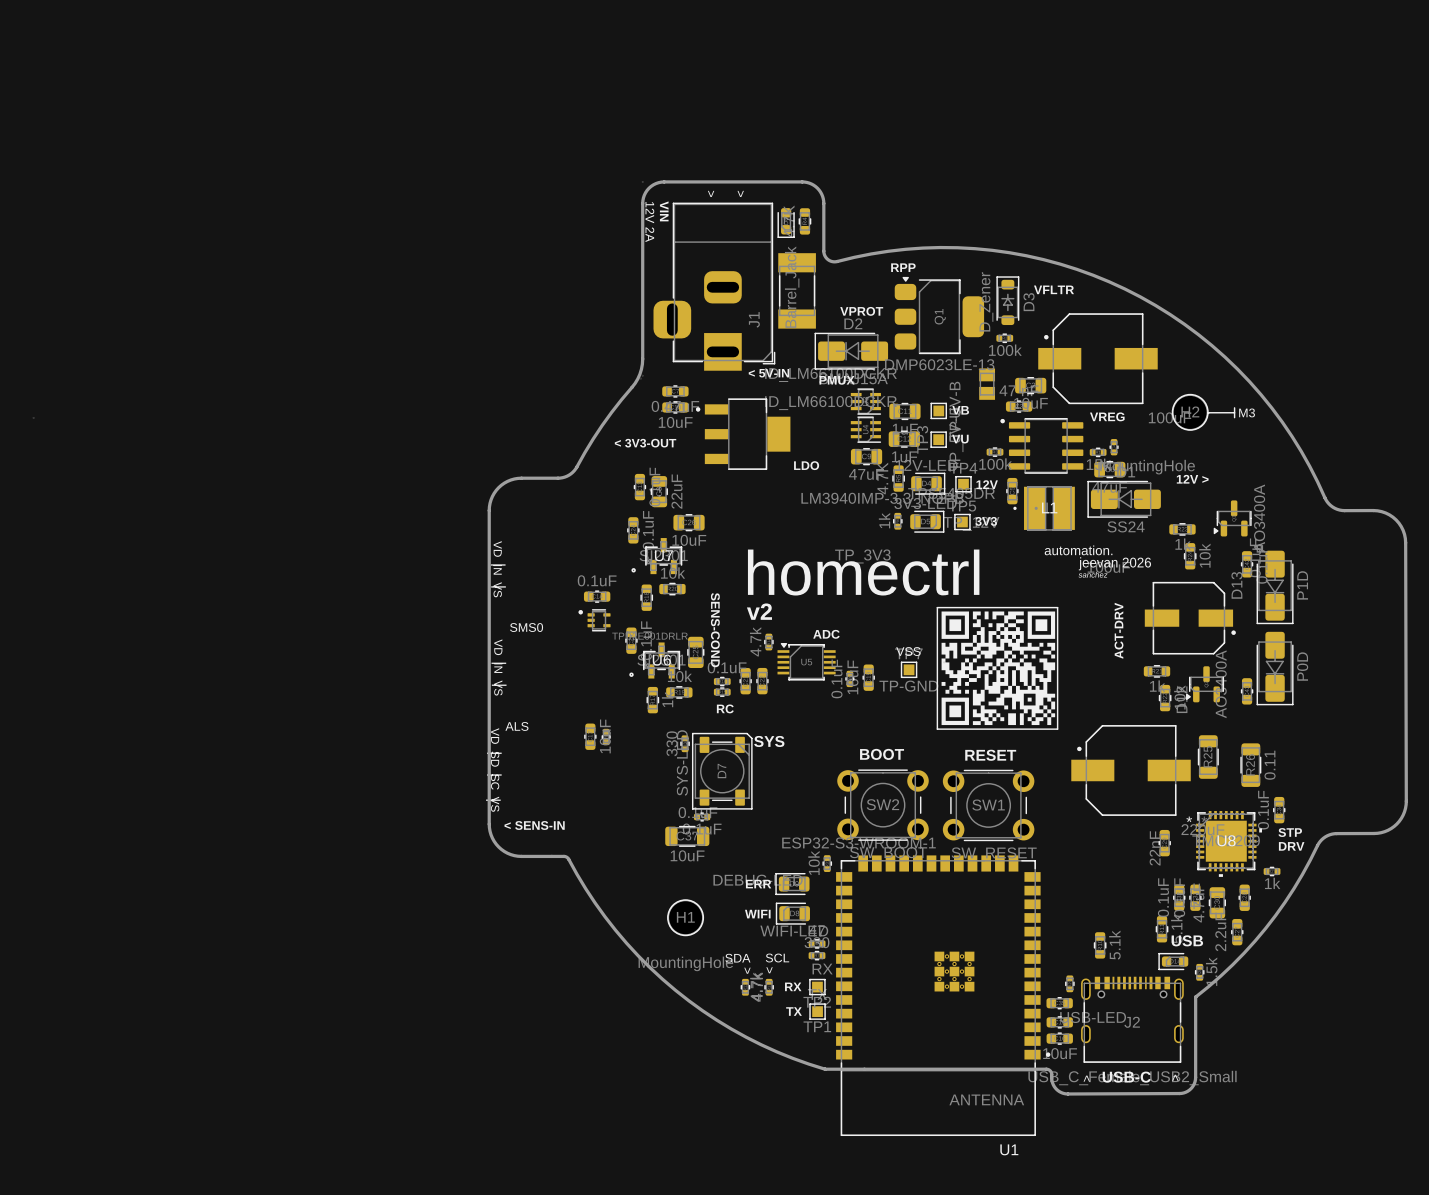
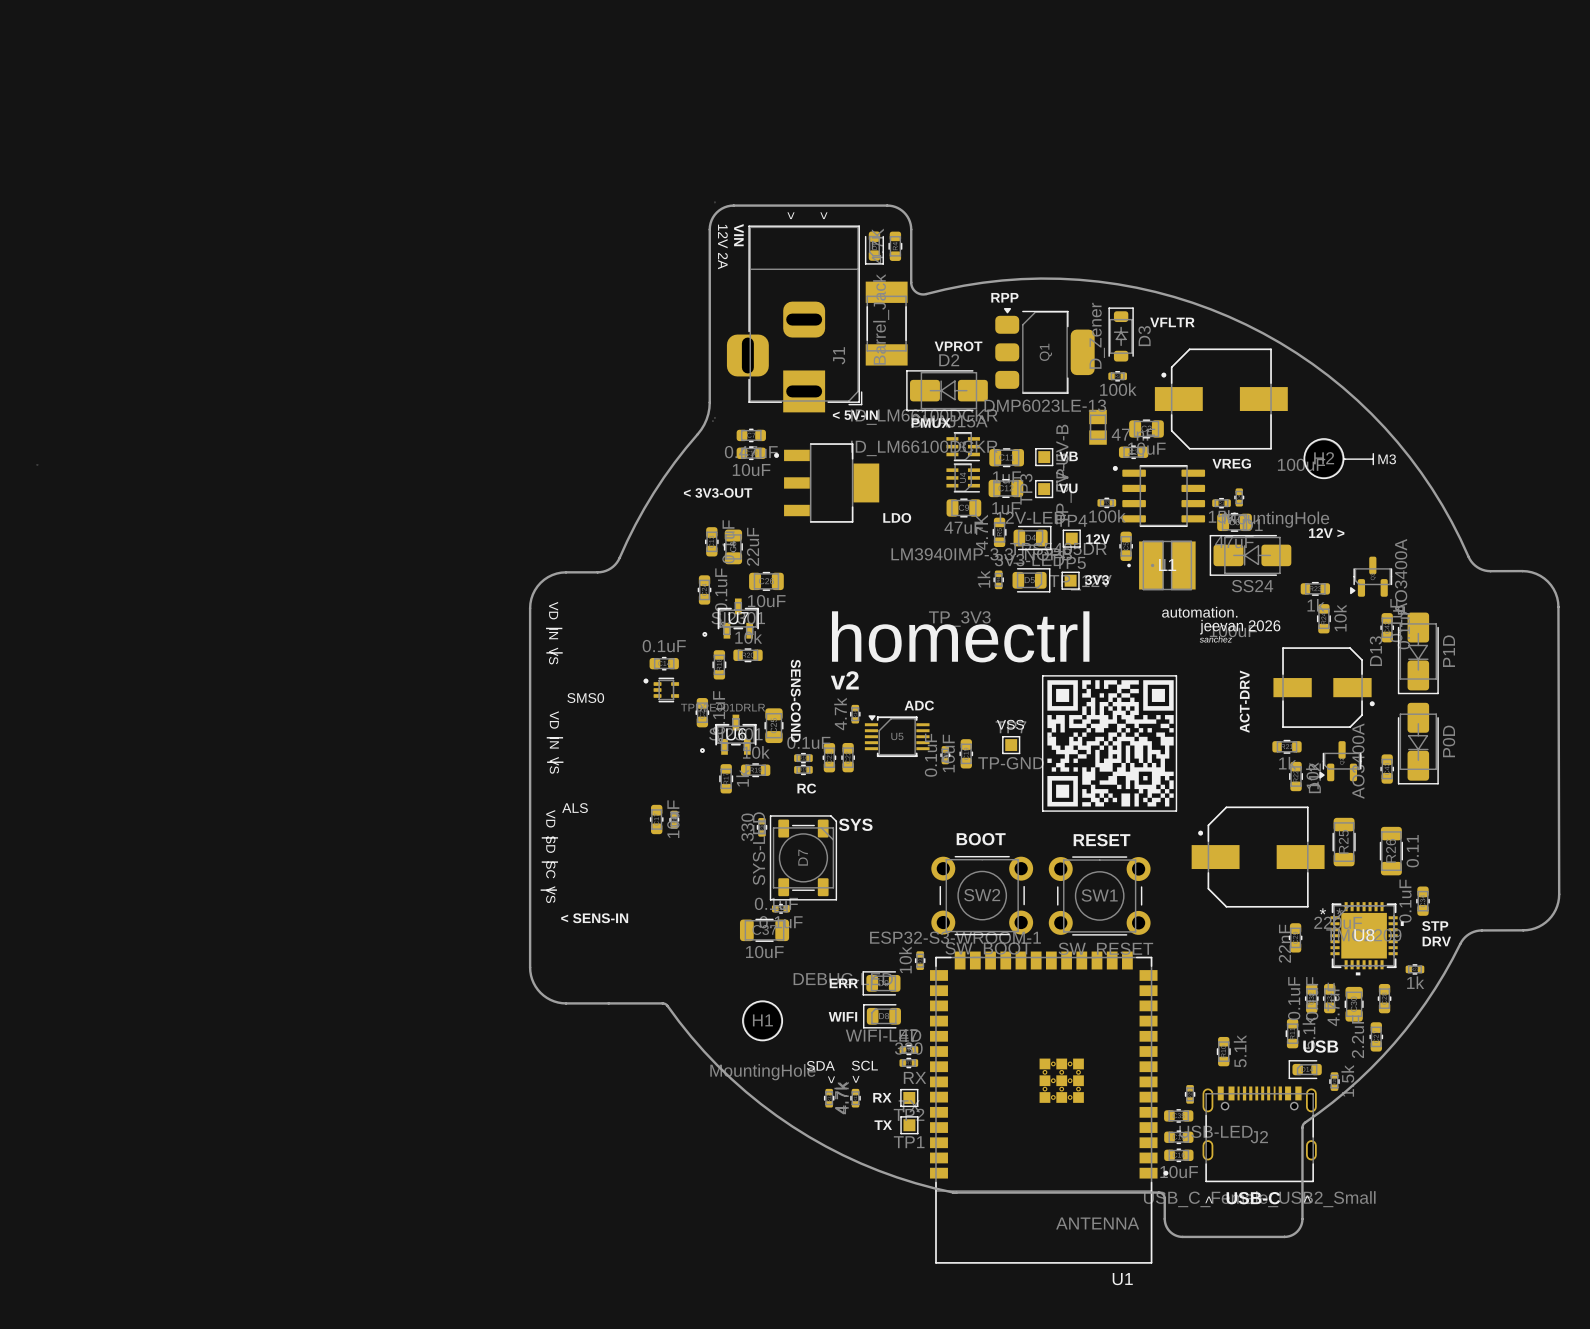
board edge: (664, 181) (802, 181) (811, 184) (819, 190) (823, 198) (823, 252) (826, 257) (831, 261) (905, 249) (974, 248) (1043, 259) (1093, 275) (1124, 289) (1155, 305) (1198, 334) (1249, 381) (1292, 436) (1330, 505) (1342, 510) (1381, 511) (1392, 517) (1401, 526) (1405, 542) (1406, 801) (1404, 811) (1396, 823) (1384, 831) (1334, 833) (1321, 839) (1293, 888) (1265, 928) (1232, 964) (1195, 997) (1195, 1079) (1193, 1085) (1187, 1091) (1179, 1093) (1066, 1093) (1055, 1087) (1051, 1072) (1047, 1069) (825, 1069) (792, 1058) (731, 1029) (688, 1000) (662, 979) (615, 930) (595, 902) (567, 857) (514, 855) (501, 849) (494, 841) (489, 824) (490, 503) (498, 487) (510, 480) (560, 478) (570, 473) (602, 425) (637, 378) (642, 358) (642, 200) (645, 192) (651, 186) (664, 181) -> (733, 205) (724, 207) (716, 212) (709, 226) (709, 402) (704, 424) (653, 492) (615, 564) (600, 572) (566, 572) (552, 575) (540, 582) (531, 598) (530, 967) (533, 983) (546, 997) (562, 1003) (665, 1004) (717, 1065) (760, 1104) (792, 1126) (825, 1146) (860, 1163) (897, 1177) (953, 1192) (1159, 1192) (1164, 1197) (1165, 1224) (1170, 1231) (1176, 1235) (1284, 1236) (1293, 1234) (1300, 1227) (1302, 1221) (1303, 1123) (1345, 1091) (1394, 1043) (1425, 1002) (1467, 935) (1479, 930) (1523, 930) (1535, 928) (1548, 919) (1557, 906) (1559, 894) (1558, 606) (1553, 589) (1544, 578) (1531, 572) (1487, 571) (1475, 565) (1469, 559) (1451, 521) (1432, 488) (1409, 457) (1384, 427) (1357, 400) (1328, 375) (1280, 342) (1246, 324) (1210, 309) (1155, 291) (1117, 284) (1079, 279) (1040, 278) (1002, 280) (920, 294) (913, 289) (911, 284) (910, 224) (905, 214) (897, 207) (887, 205) (733, 205)

